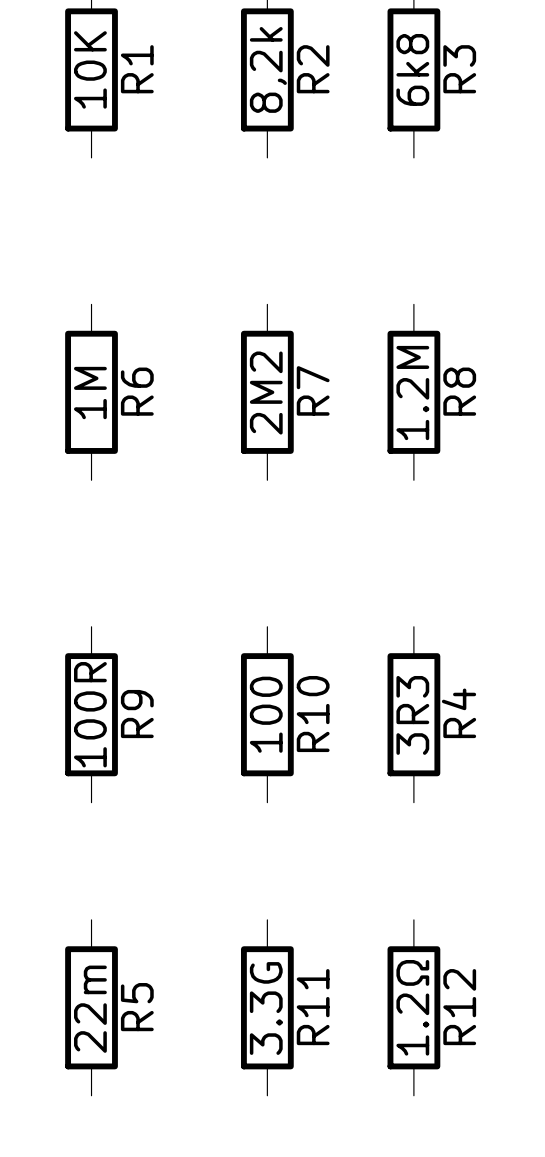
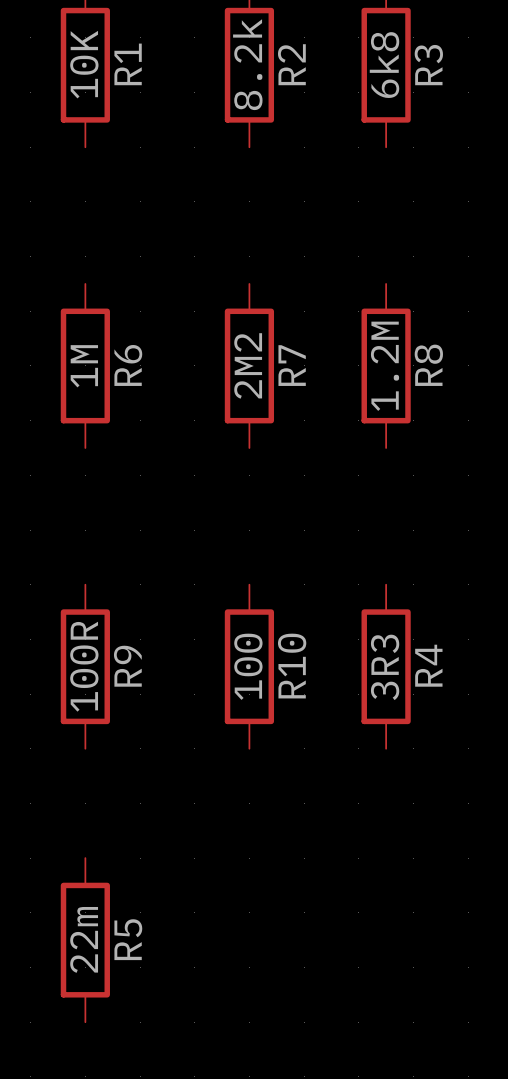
R2 value: 8,2k (268, 69) -> 8.2k (247, 64)
R11: 3.3G (267, 1007) -> none
R12: 1.2Ω (413, 1007) -> none

